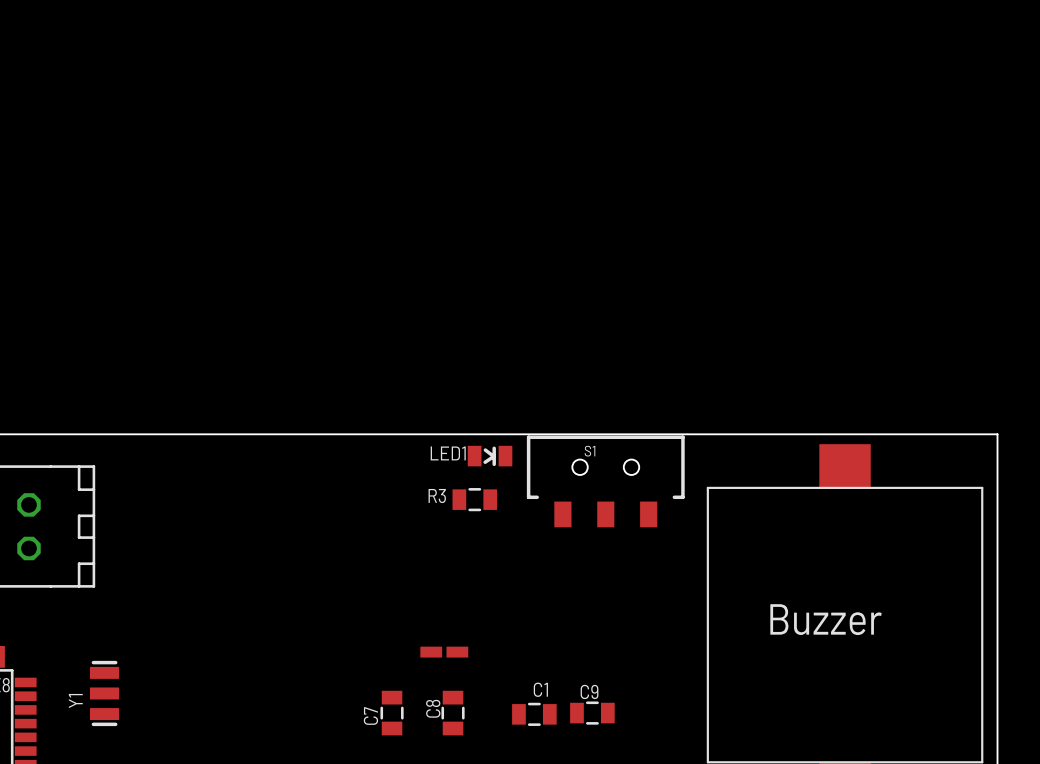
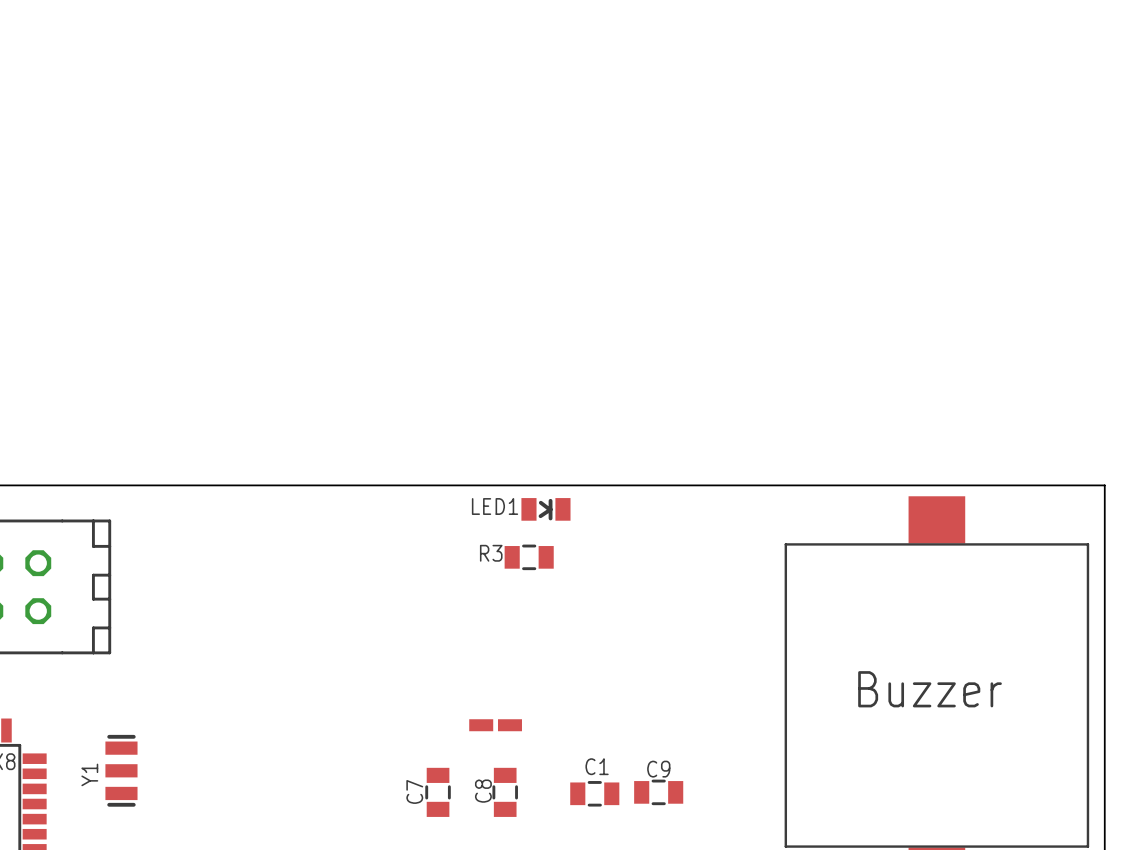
S1: (605, 481) -> none

